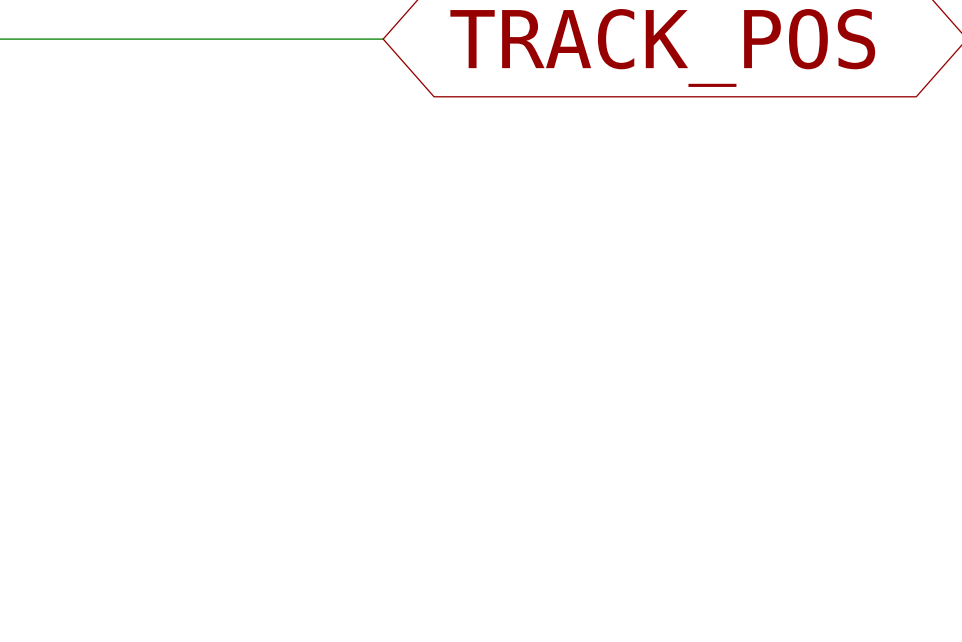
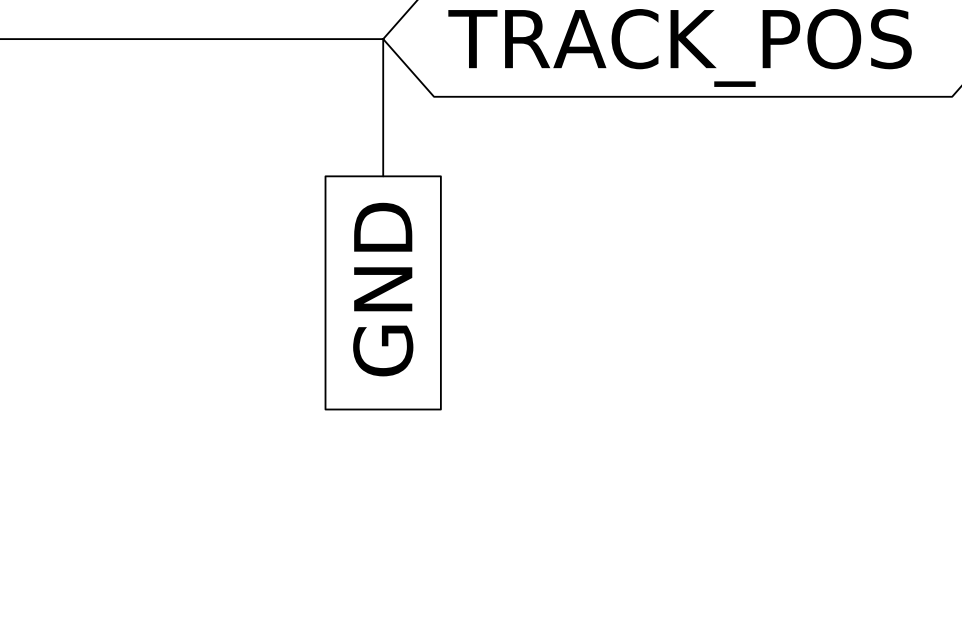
wire: none -> (383, 39) (383, 176)
global label: none -> GND (383, 289)

